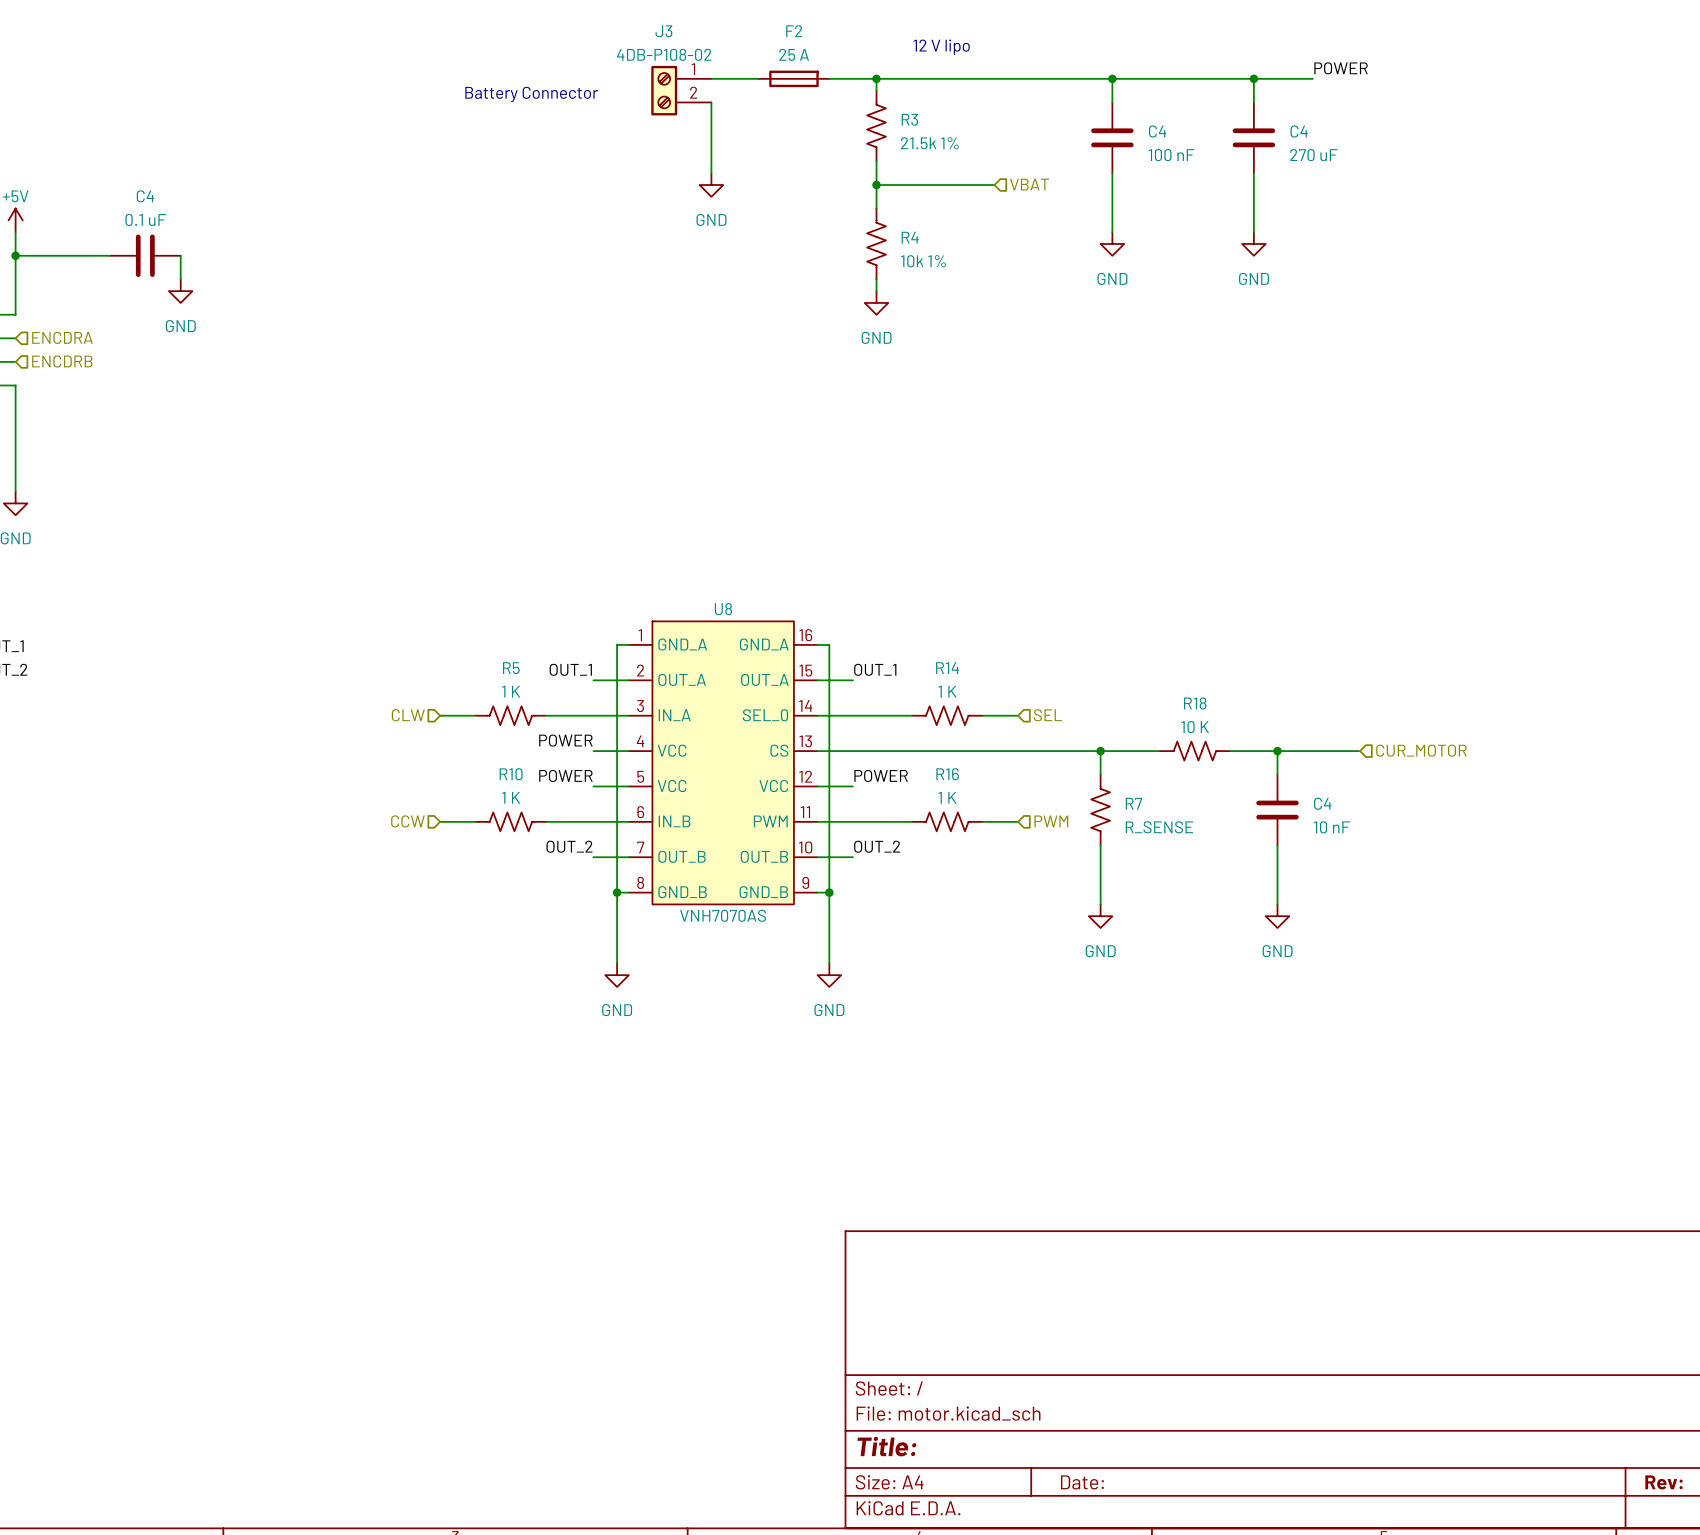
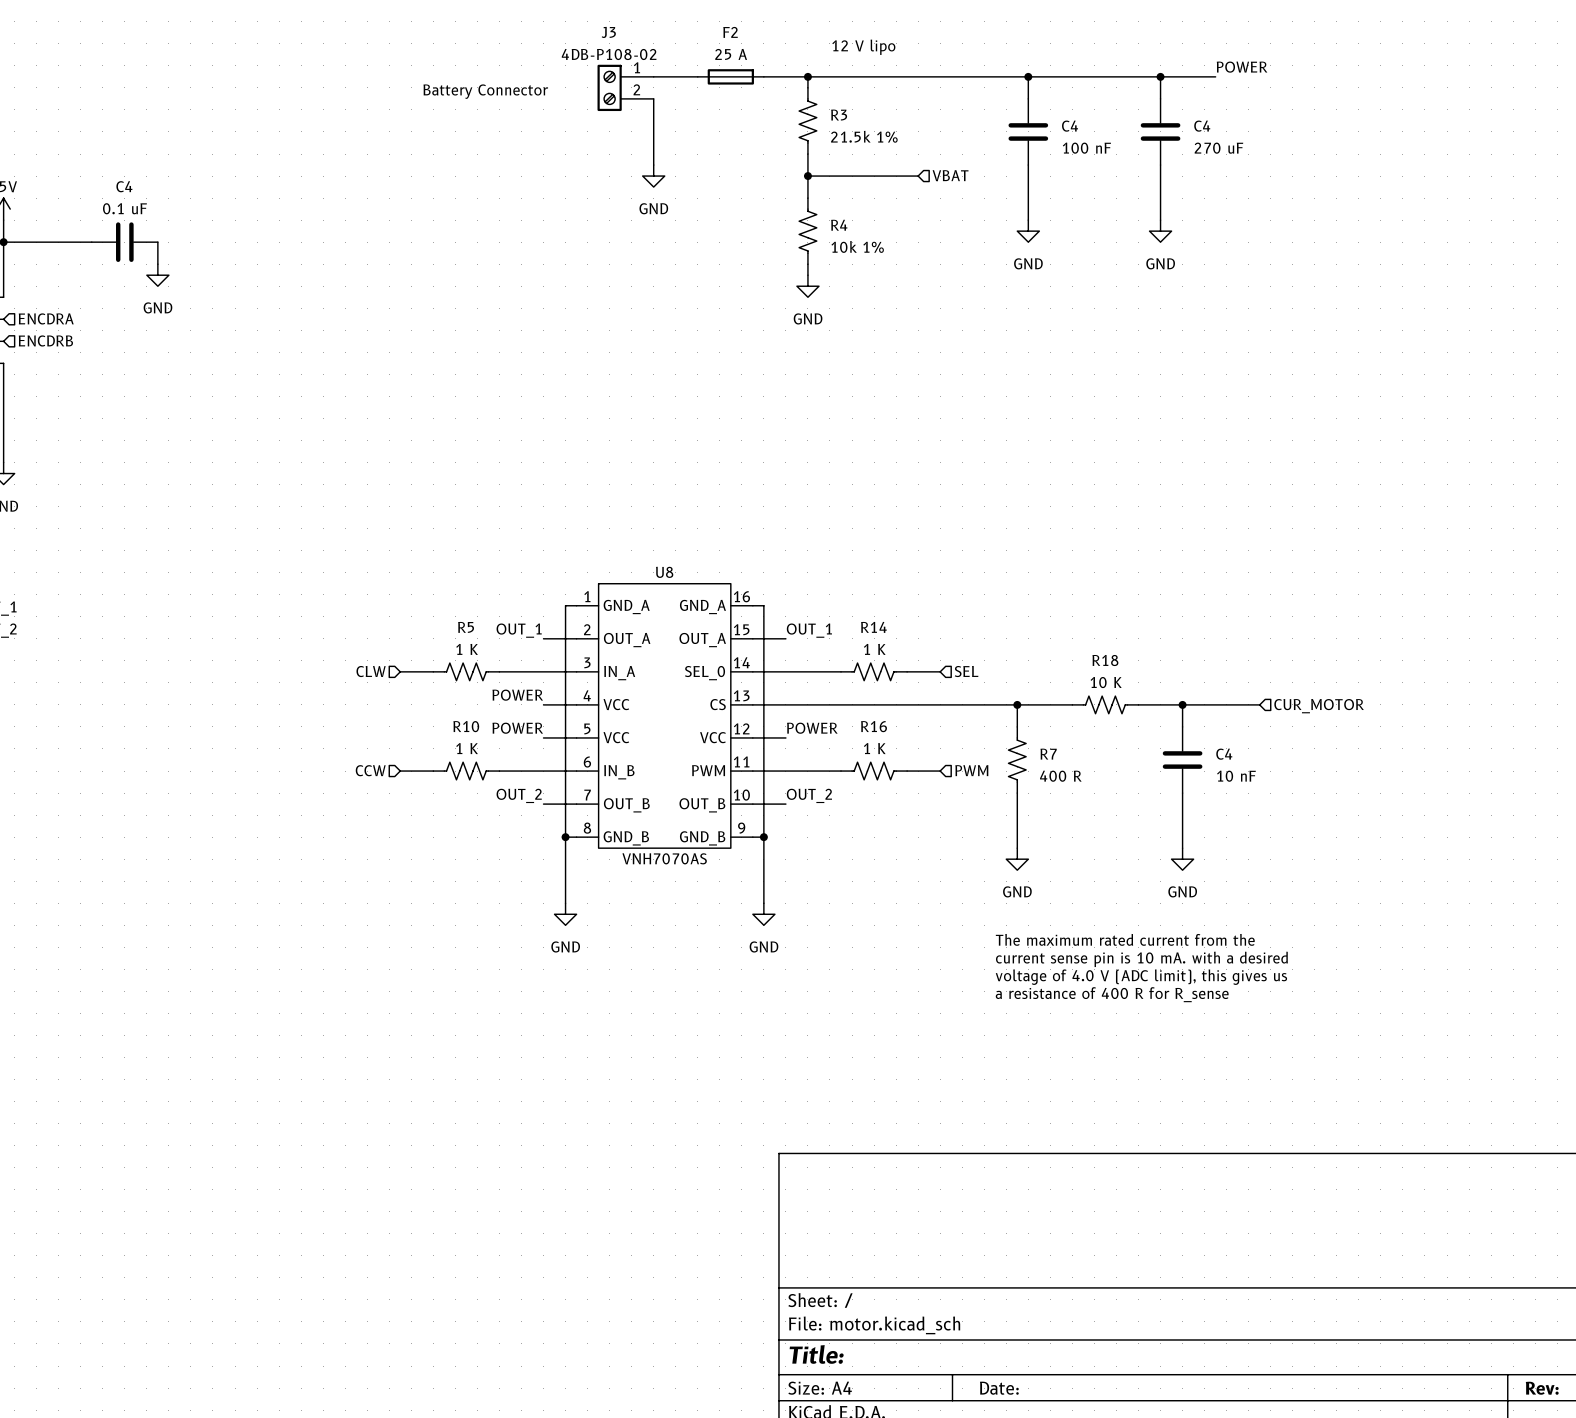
R7 value: R_SENSE (1159, 827) -> 400 R (1060, 776)
text: none -> The maximum rated current from the (1125, 939)
text: none -> current sense pin is 10 mA. with a desired (1141, 959)
text: none -> voltage of 4.0 V (ADC limit), this gives us (1141, 977)
text: none -> a resistance of 400 R for R_sense (1112, 994)

